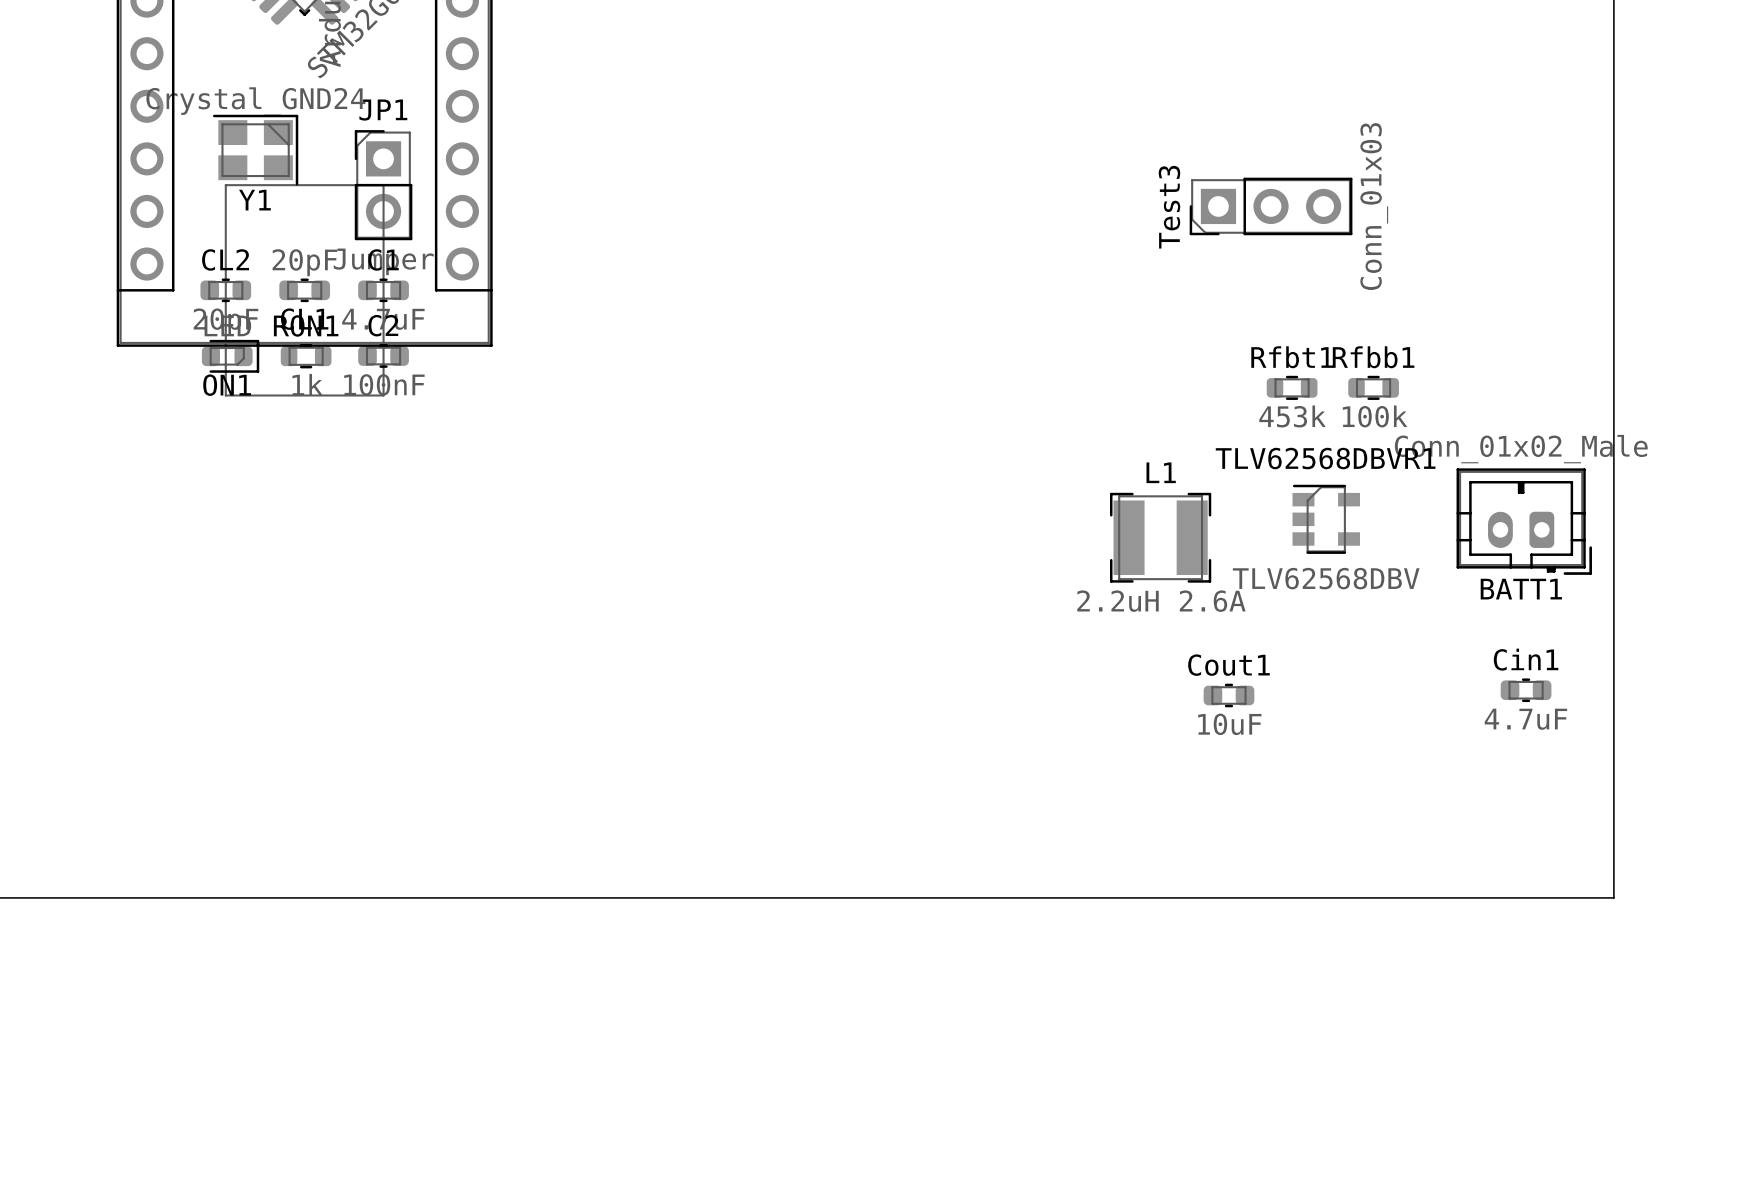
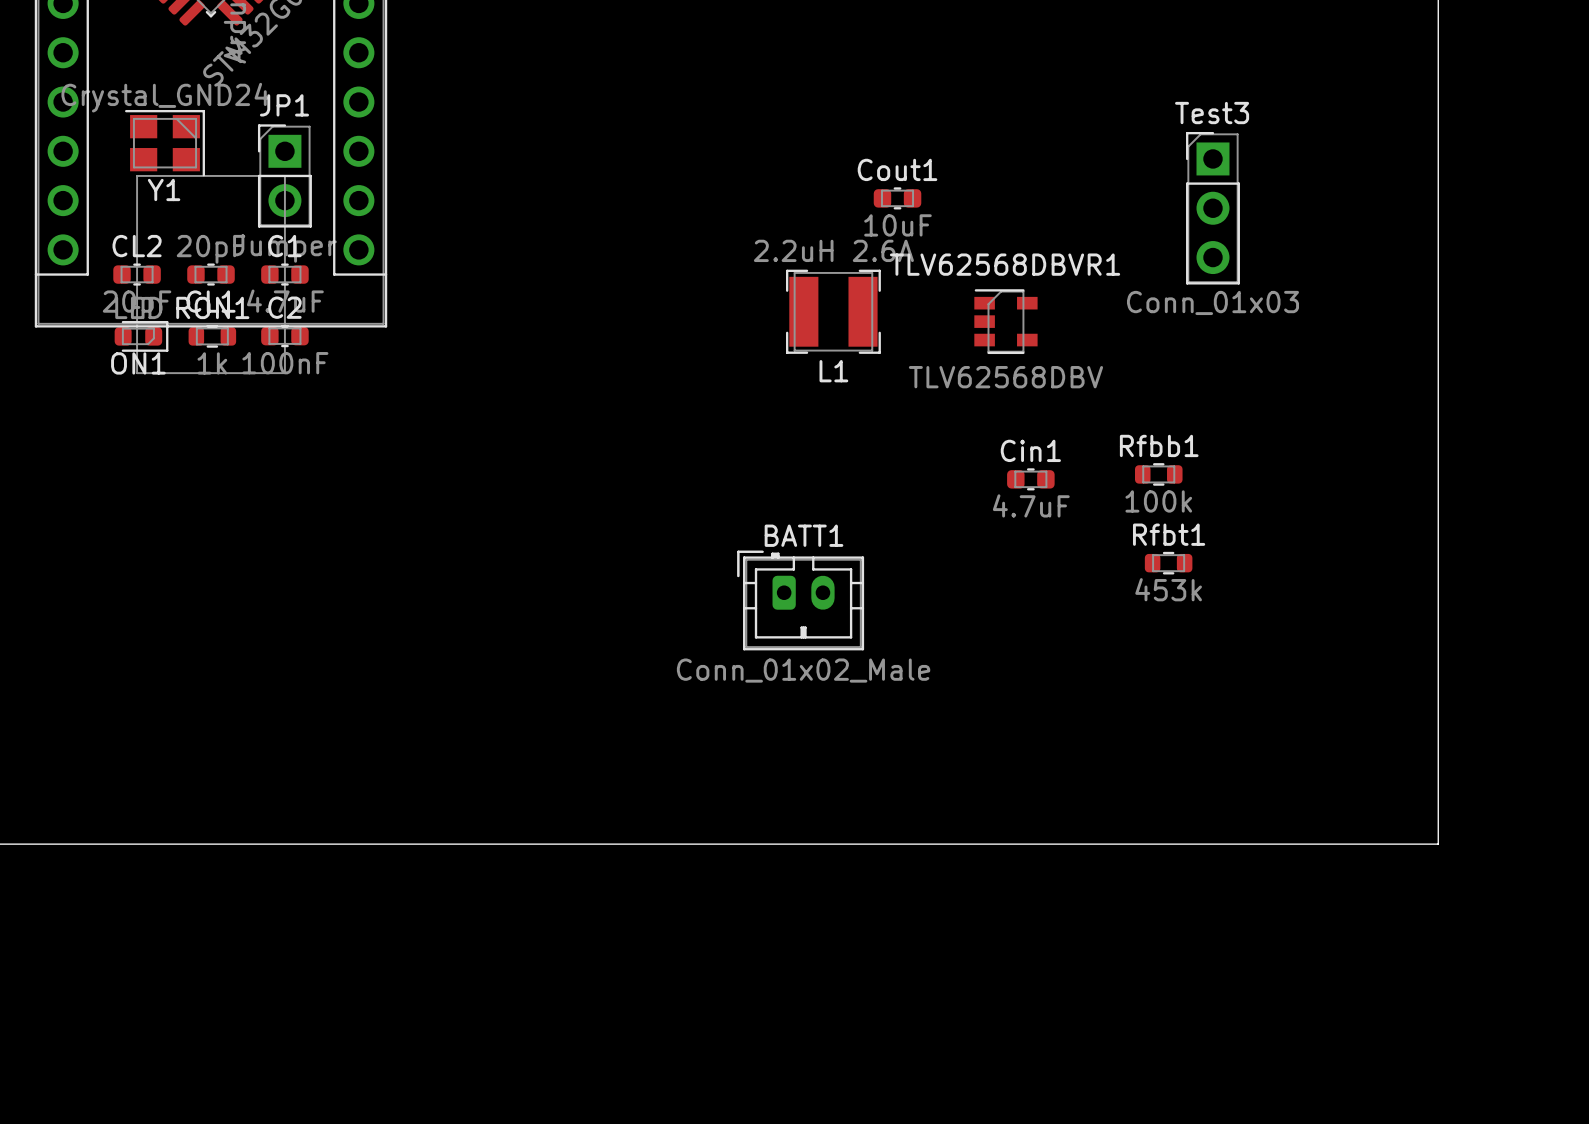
Test3 rotation: 0° (1271, 206) -> 90° clockwise (1212, 208)
Test3 position: (1271, 206) -> (1212, 208)
Rfbt1 position: (1292, 387) -> (1168, 563)
Rfbb1 position: (1373, 387) -> (1158, 474)
L1 name position: L1 (1161, 472) -> L1 (833, 371)
TLV62568DBVR1 position: (1326, 519) -> (1005, 321)
BATT1 rotation: 0° (1524, 521) -> 180° (800, 600)
BATT1 position: (1524, 521) -> (800, 600)
L1 position: (1160, 537) -> (833, 311)
L1 value position: 2.2uH 2.6A (1161, 601) -> 2.2uH 2.6A (833, 250)
Cin1 position: (1526, 690) -> (1030, 479)
Cout1 position: (1228, 695) -> (897, 198)

